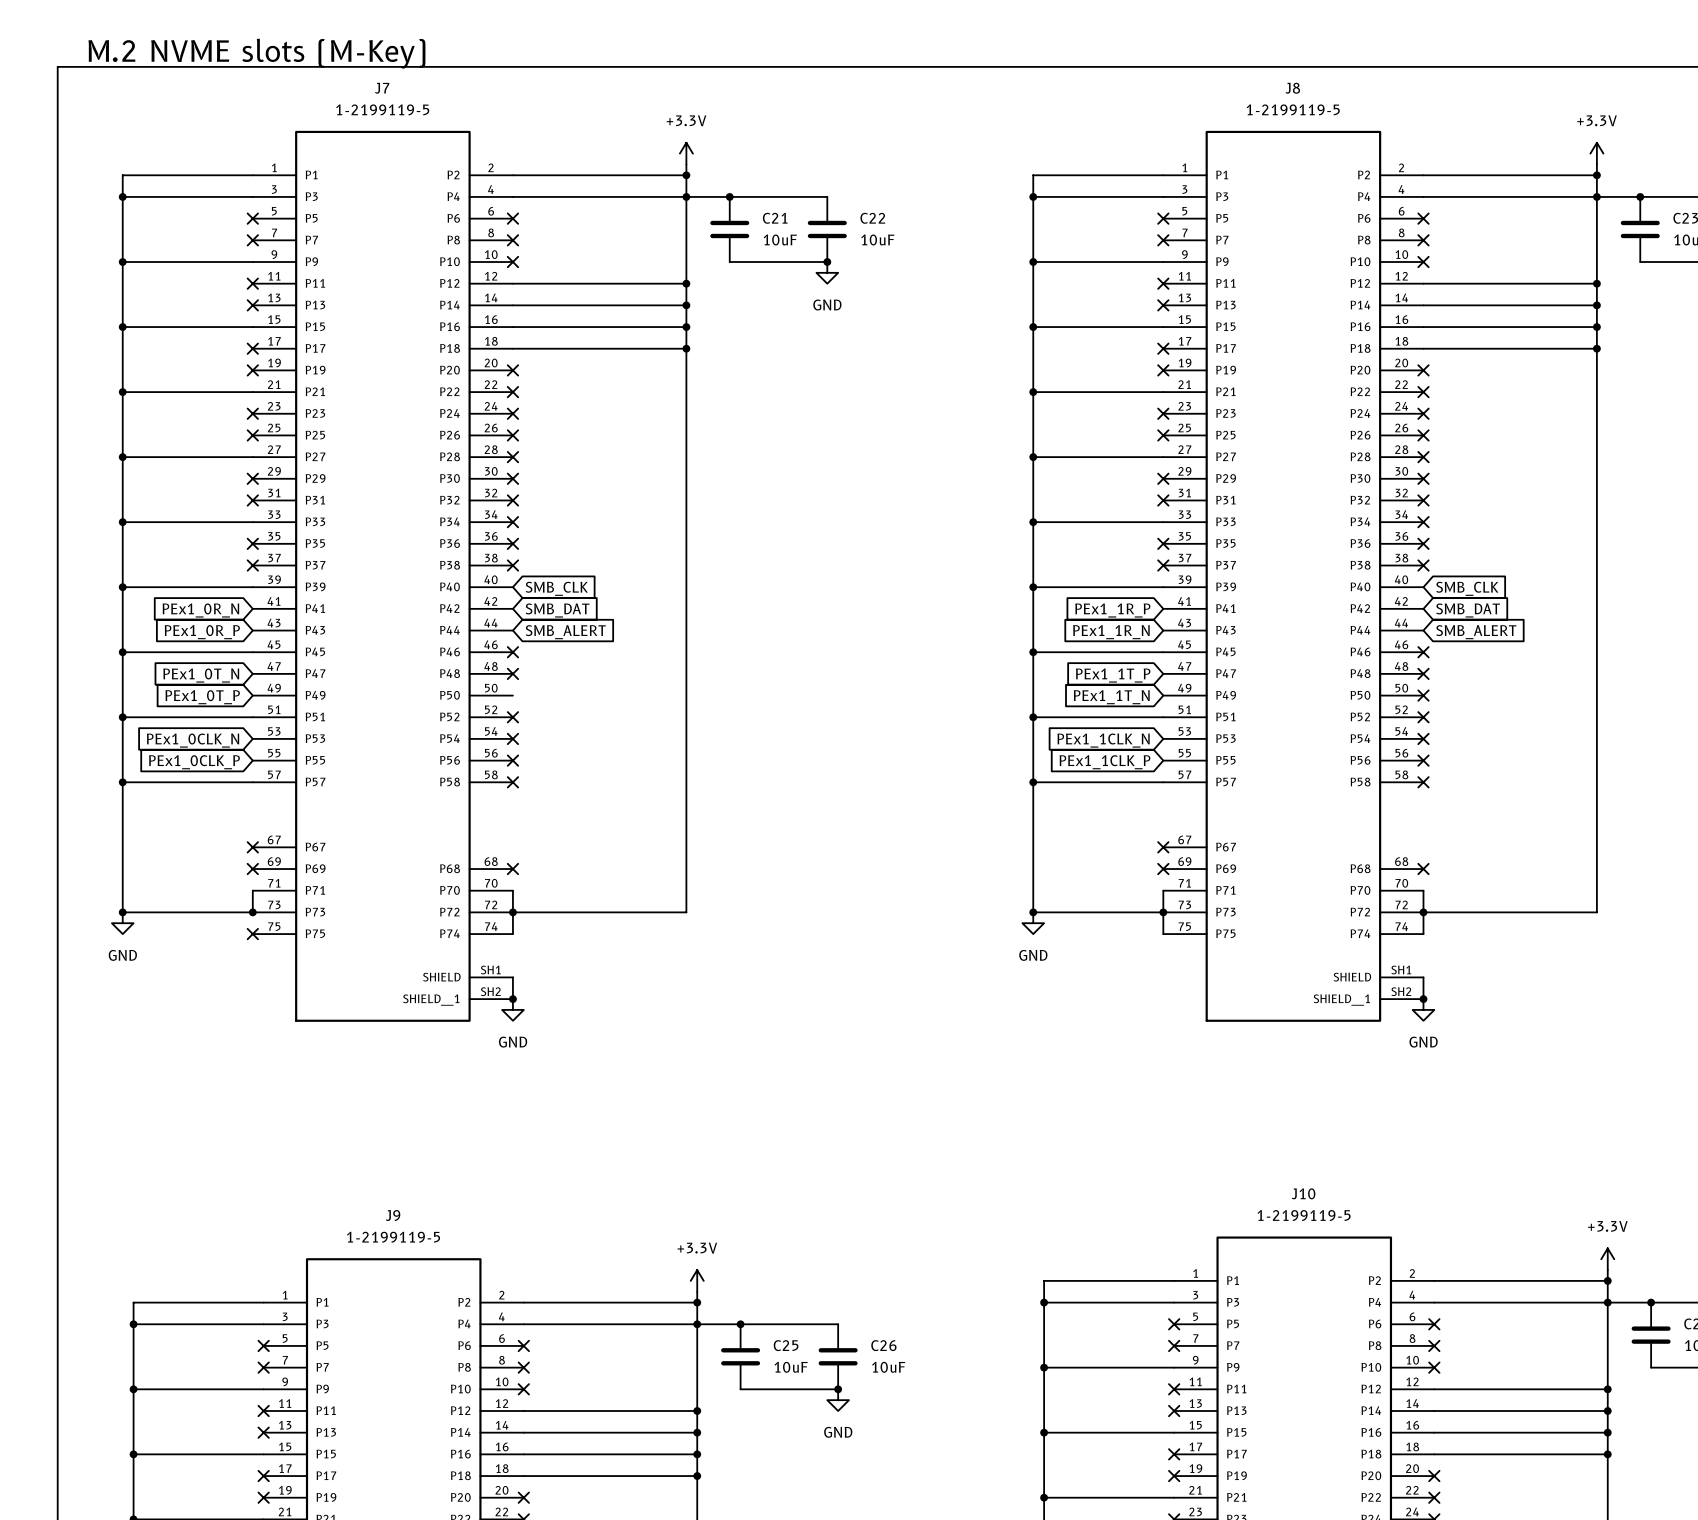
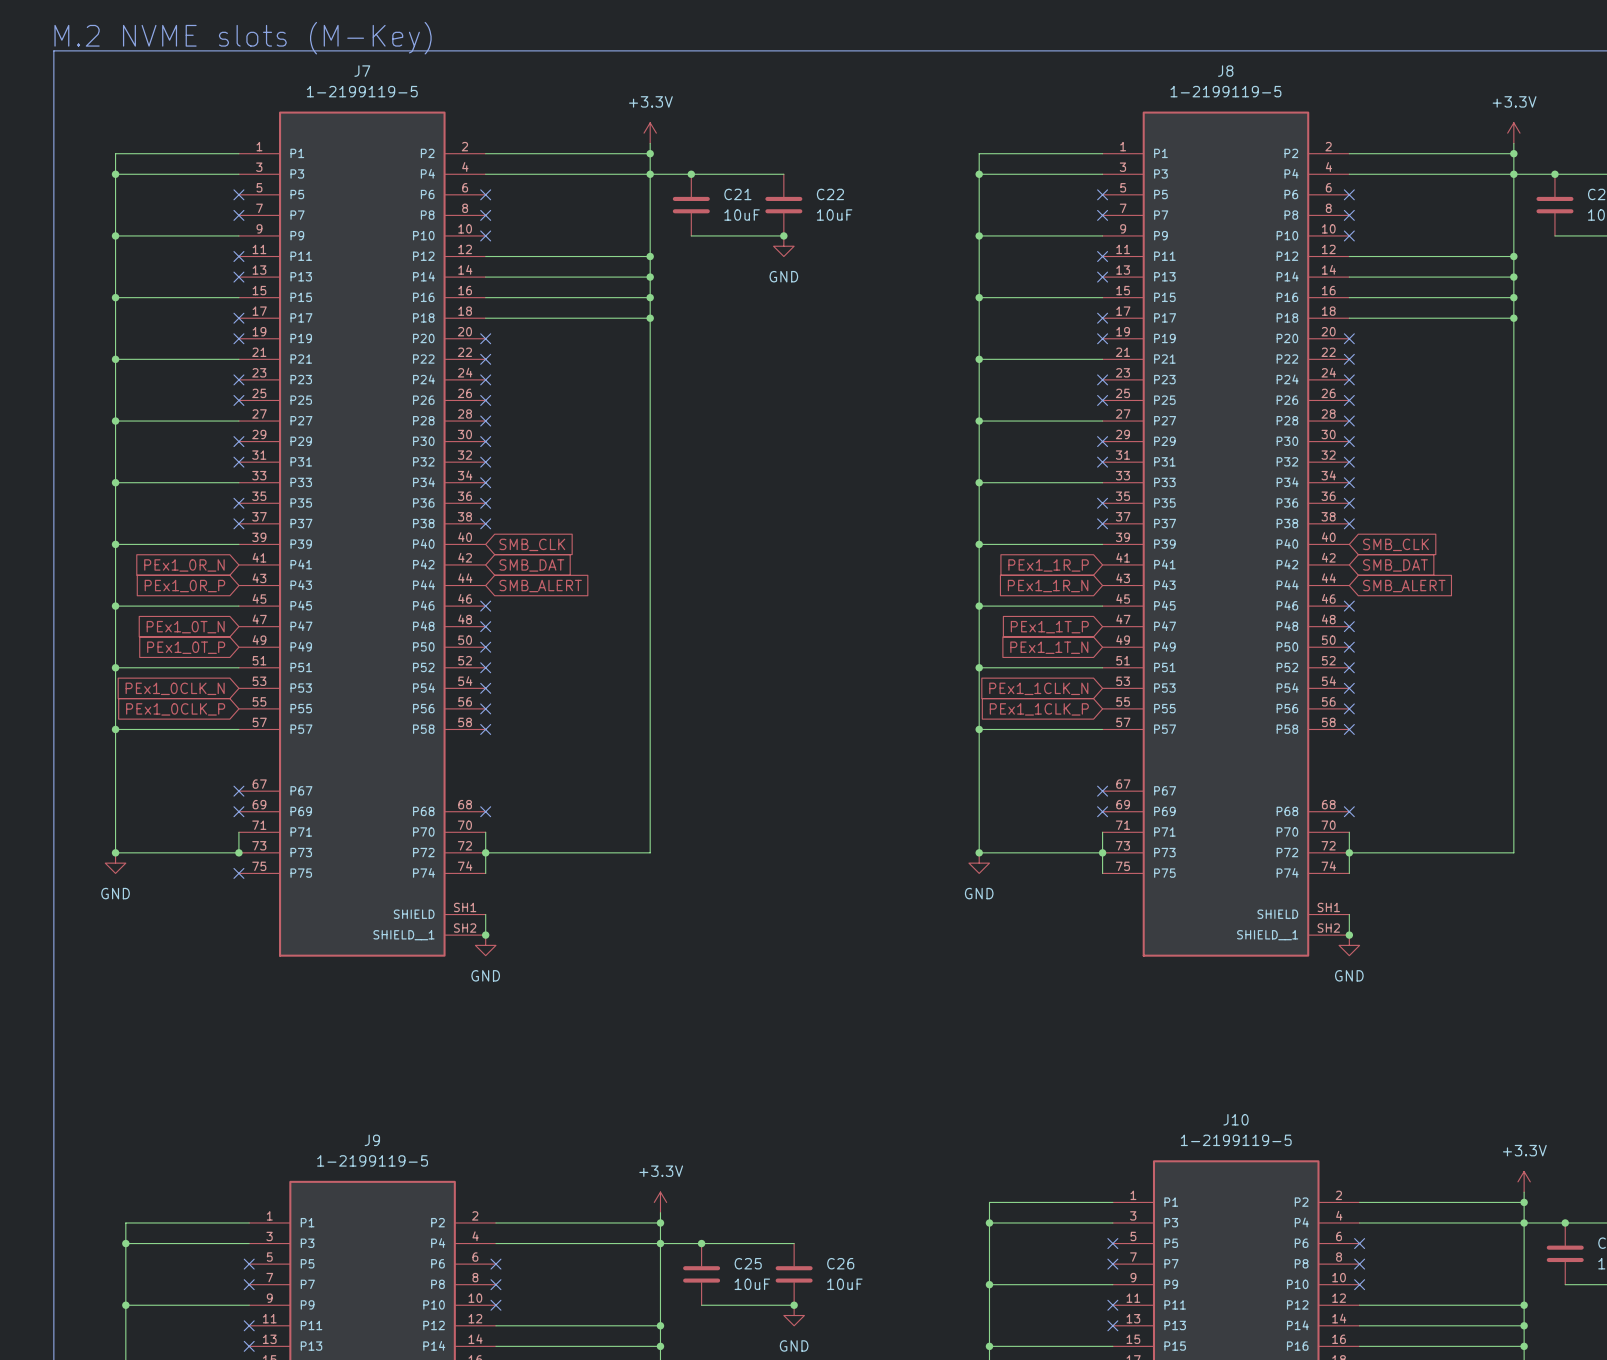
no-connect mark: none -> (485, 647)

